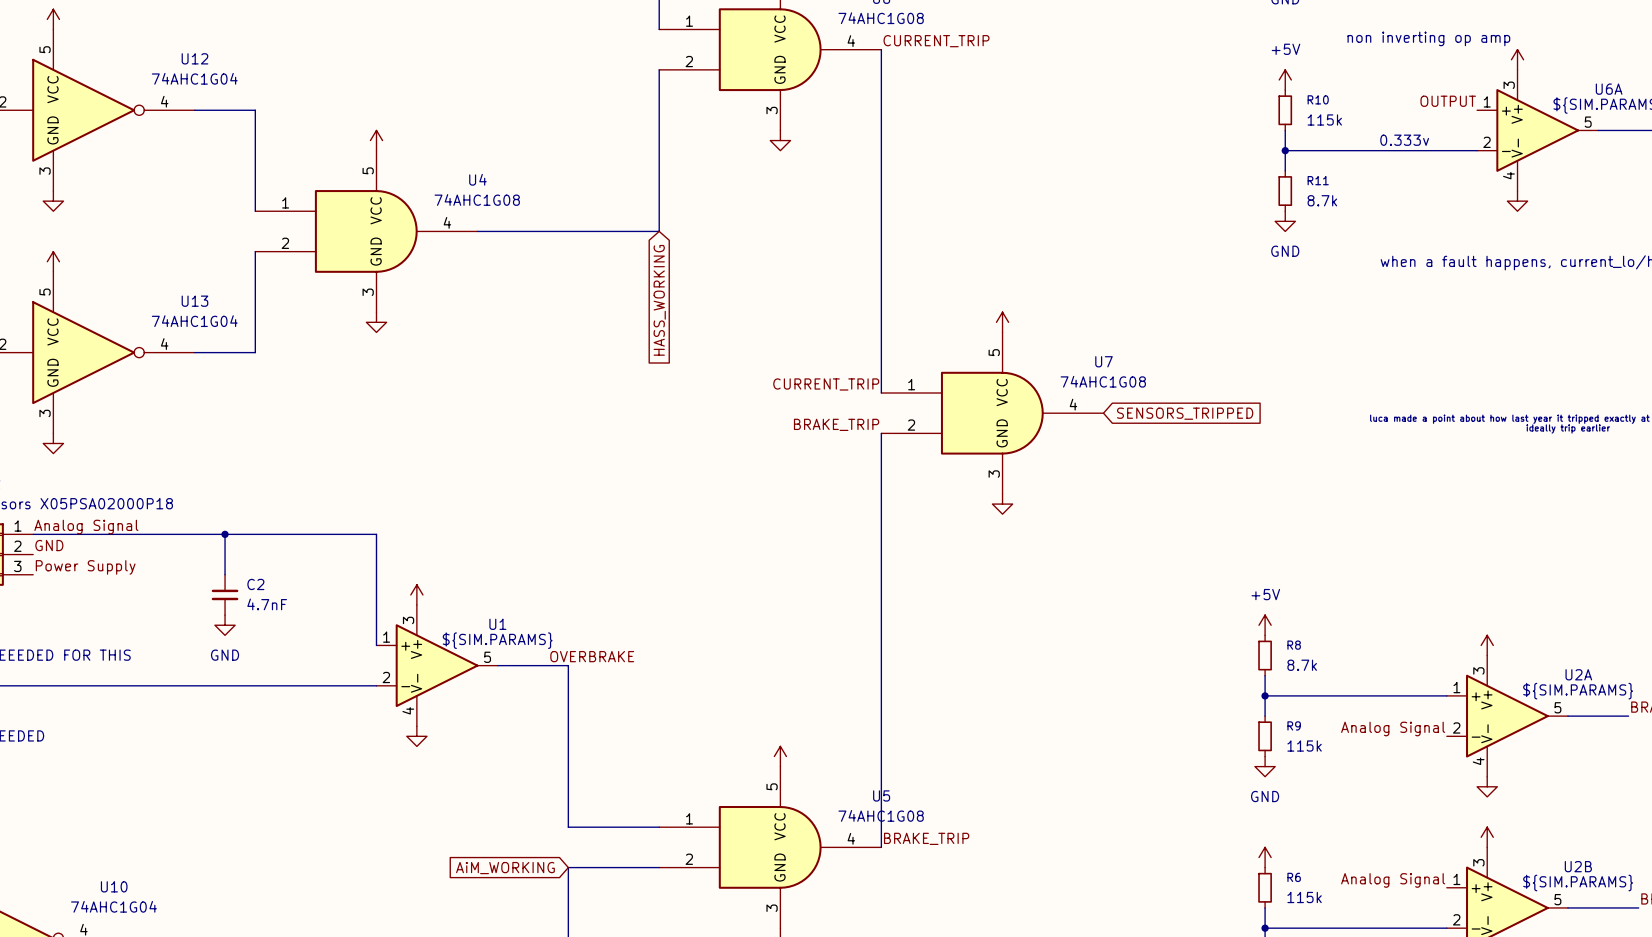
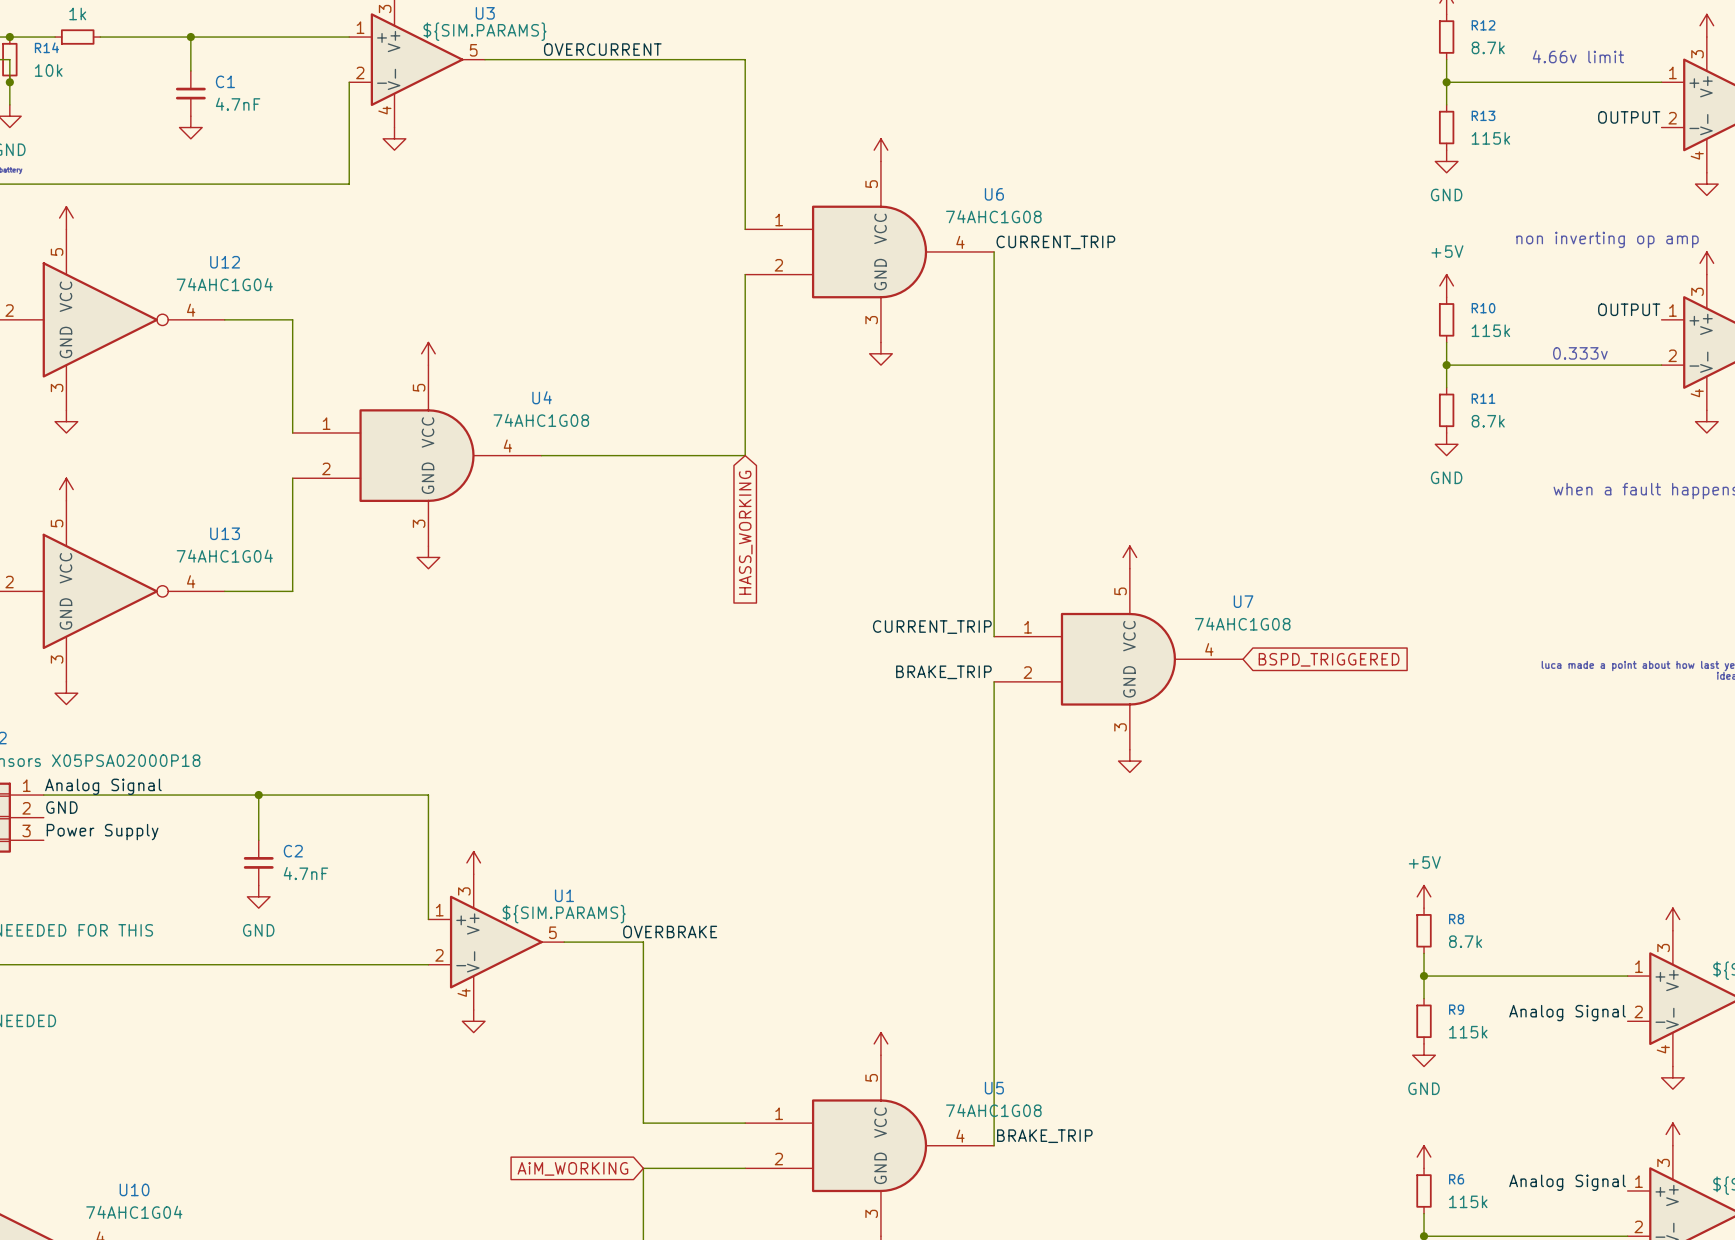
global label: SENSORS_TRIPPED (1185, 413) -> BSPD_TRIGGERED (1329, 659)

